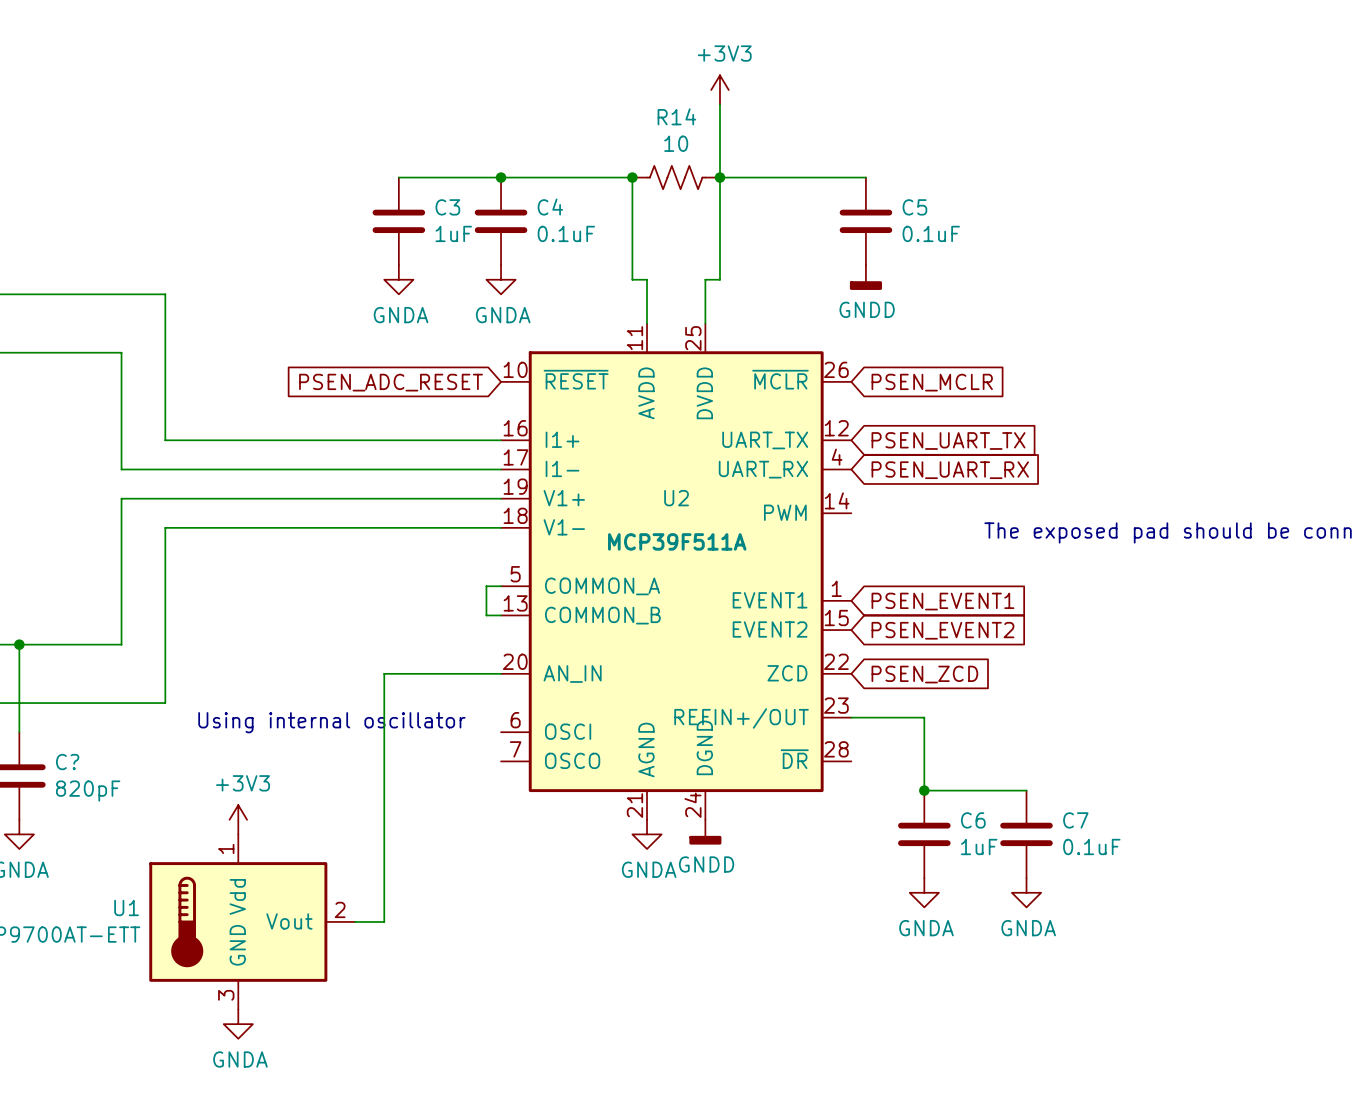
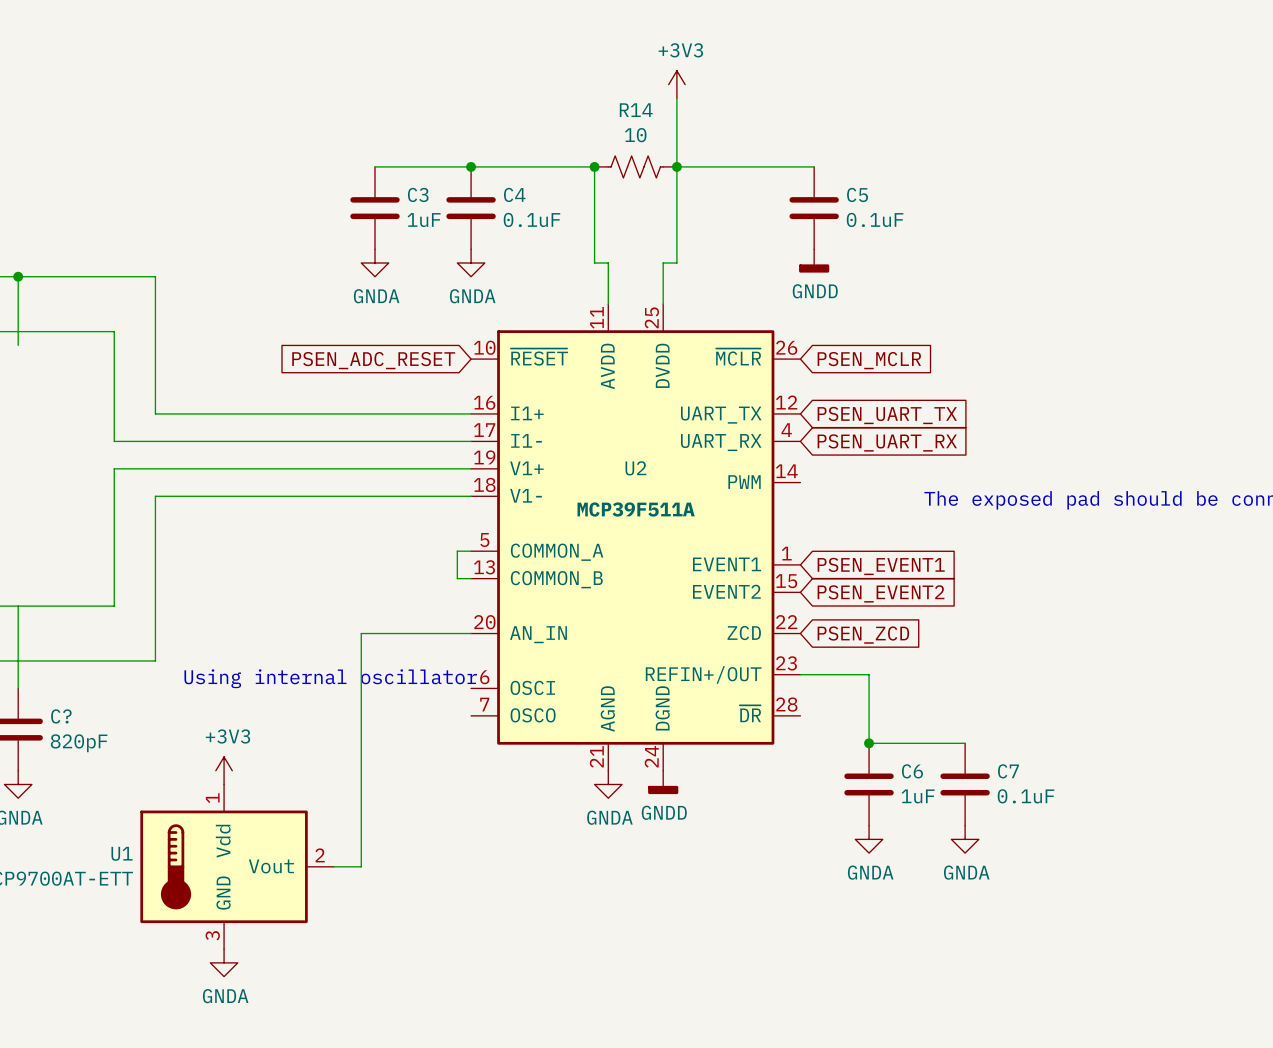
wire: none -> (18, 276) (18, 345)
junction: none -> (18, 276)
junction: (19, 644) -> none

